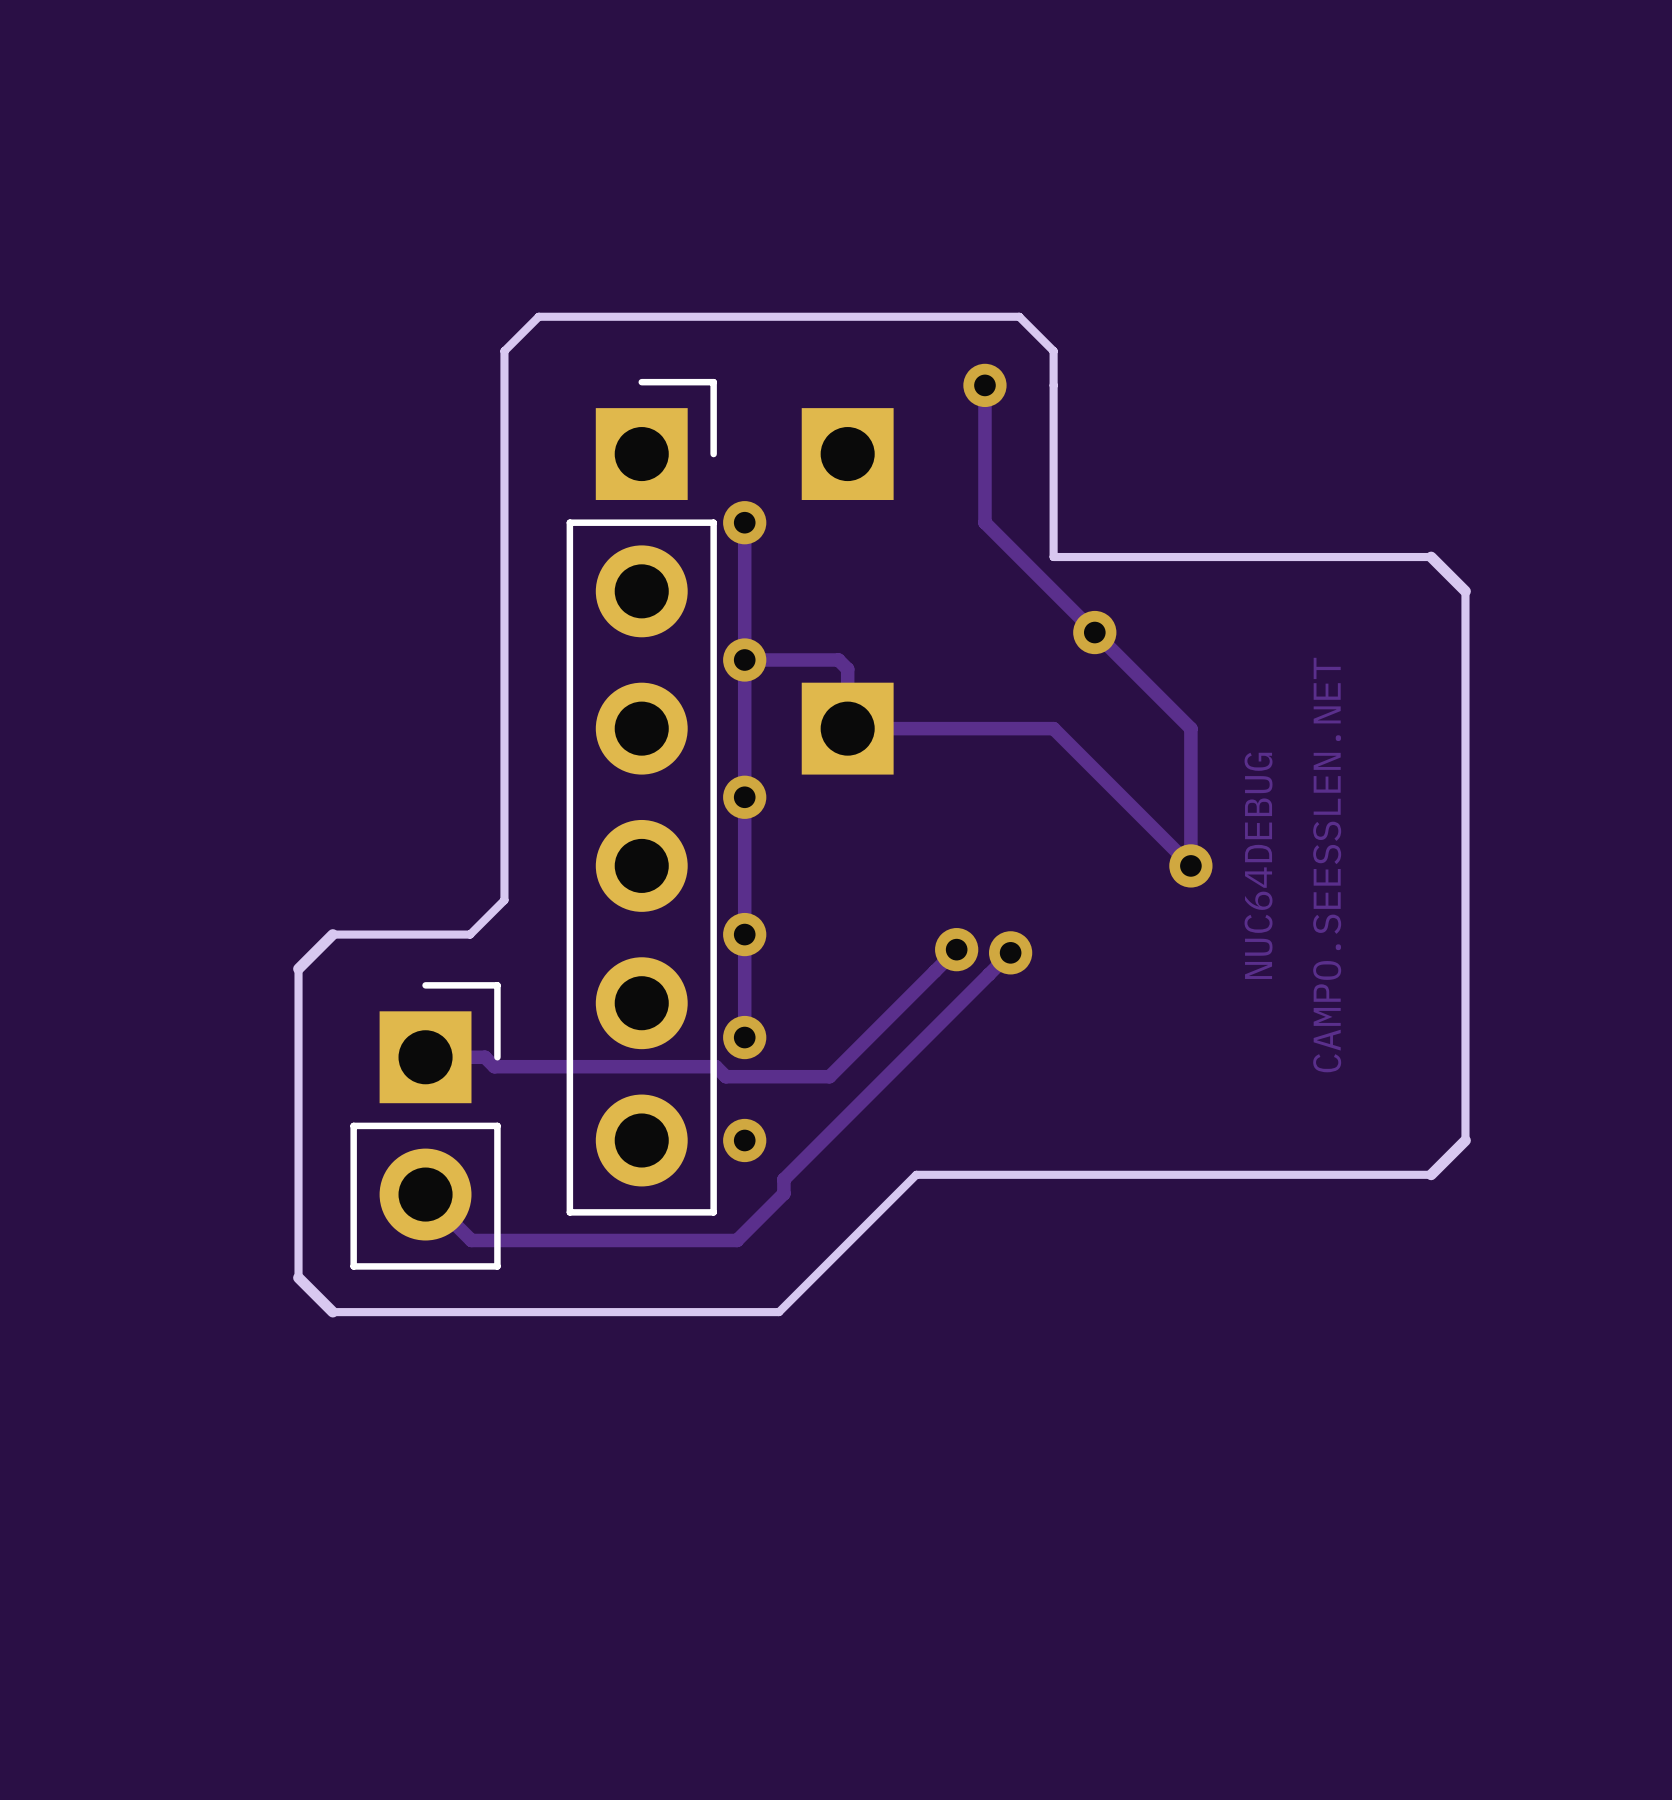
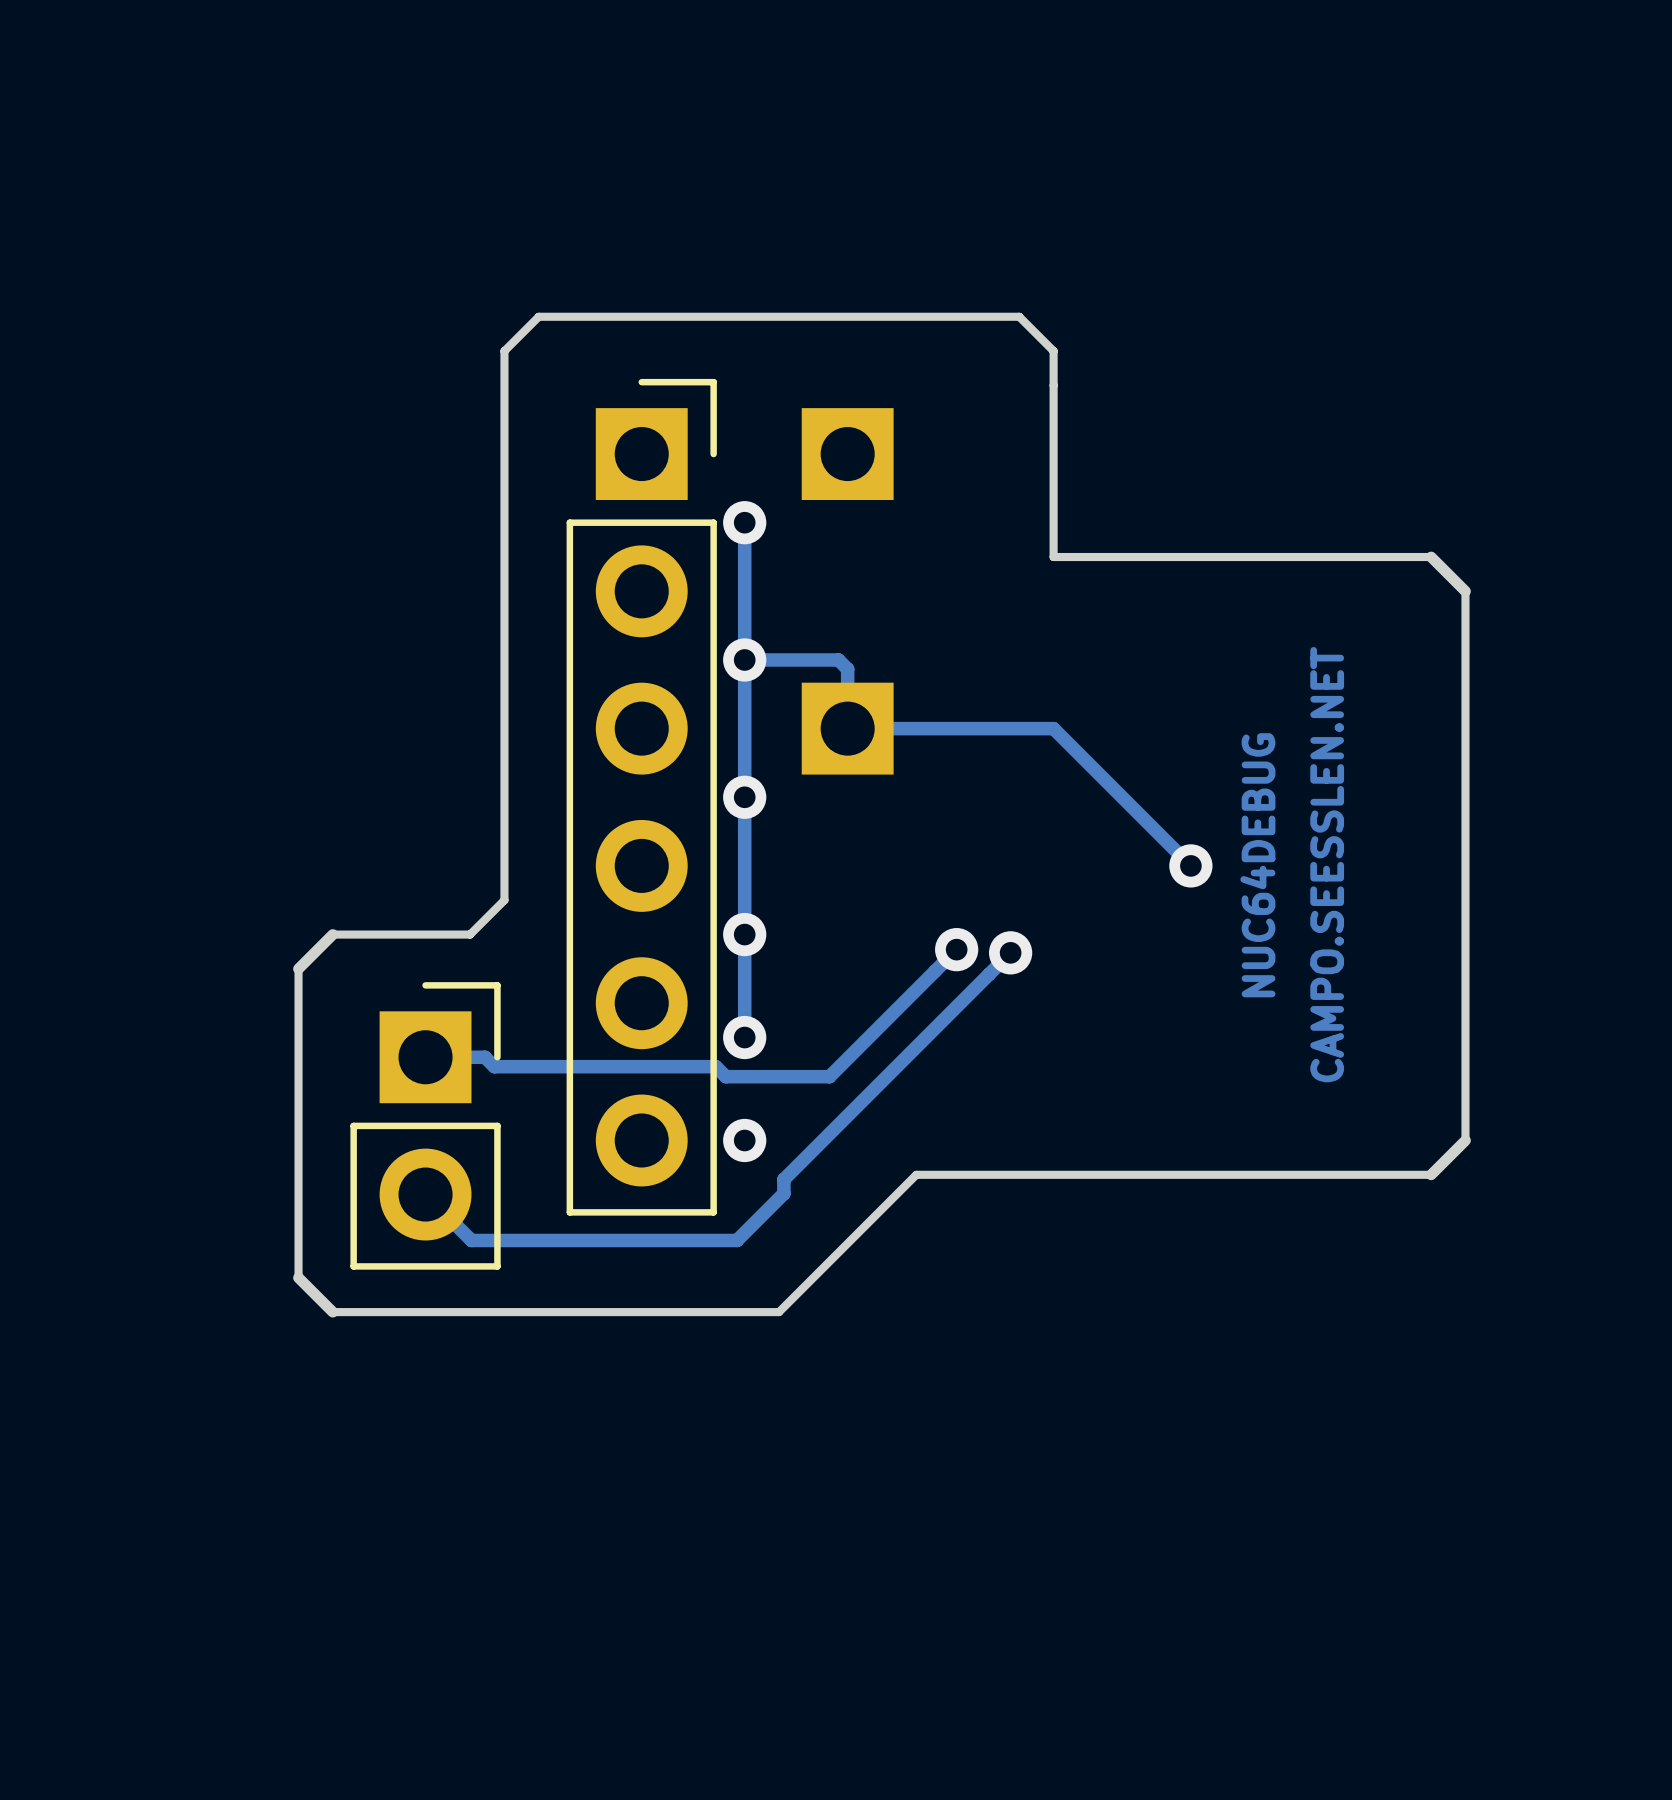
track: (984, 385) (984, 522) (1190, 728) (1190, 865) -> none
via: (984, 385) -> none
via: (1094, 632) -> none

